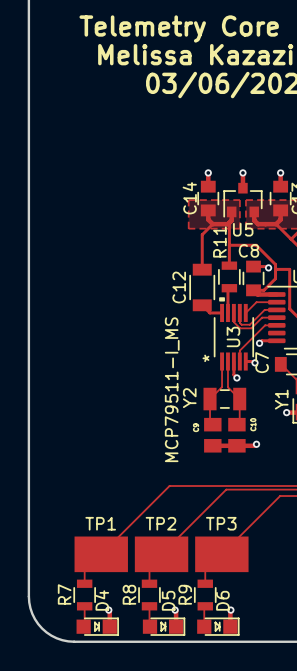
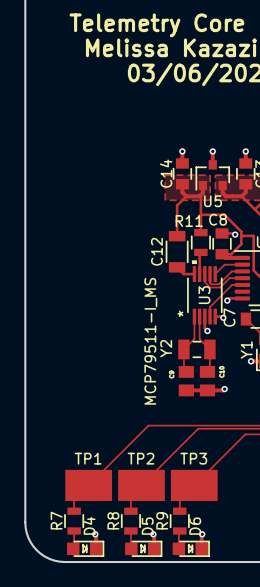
R11 name rotation: 0° (219, 241) -> 90° clockwise (189, 221)

